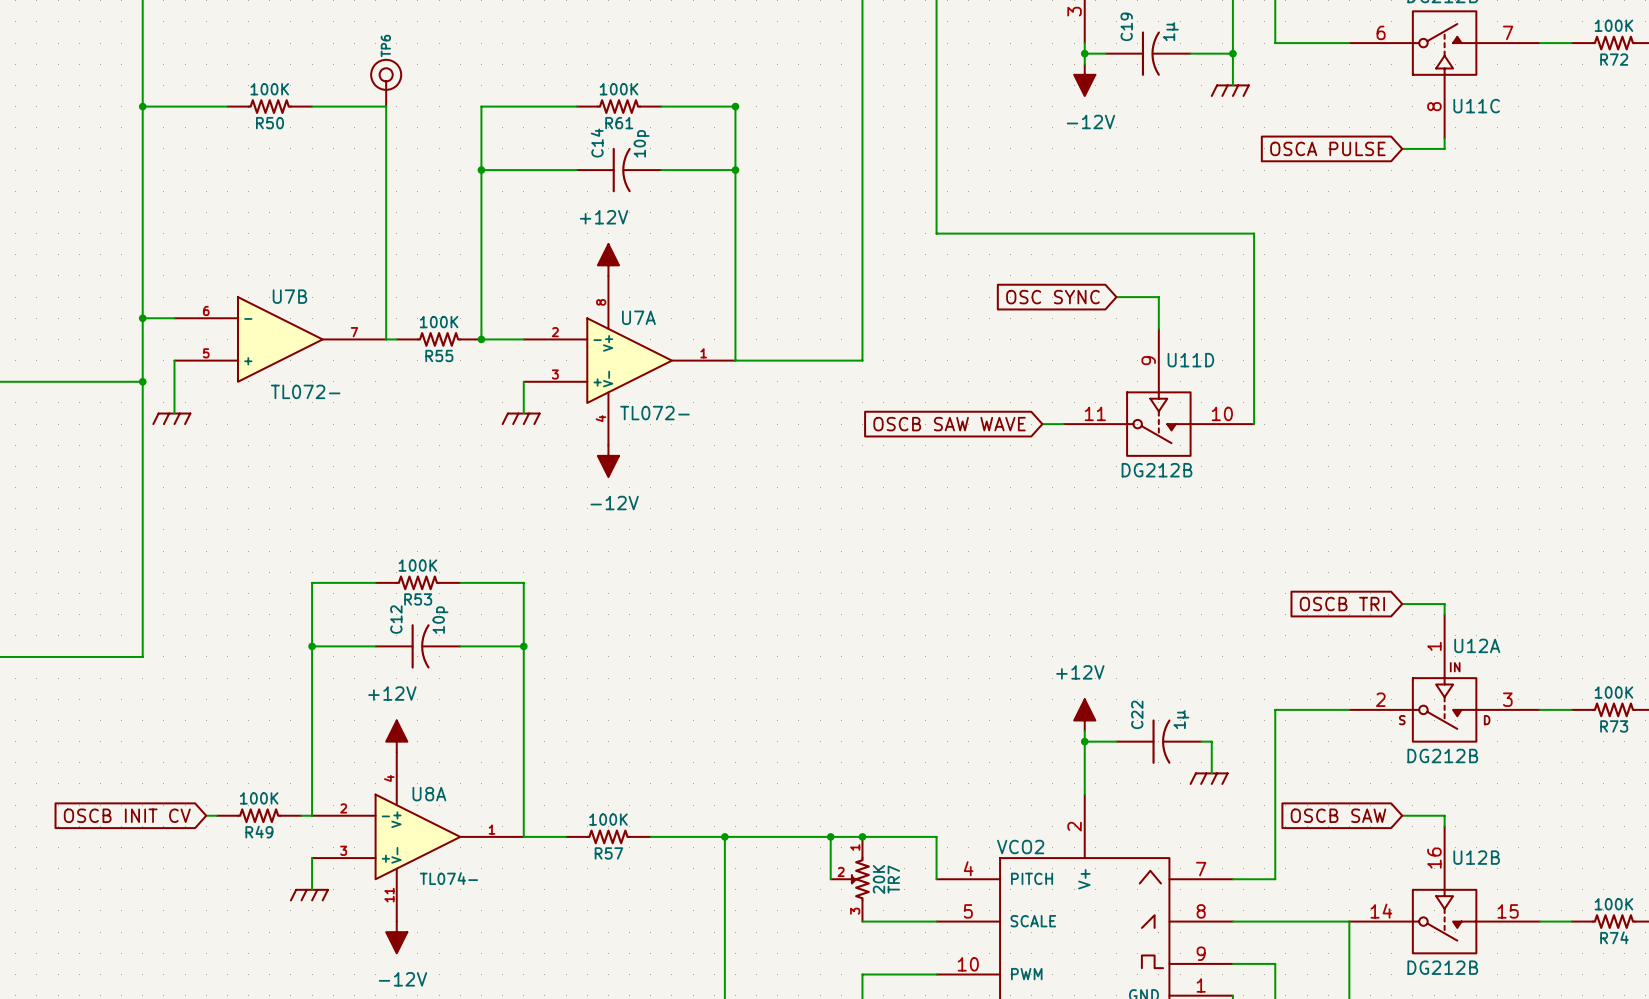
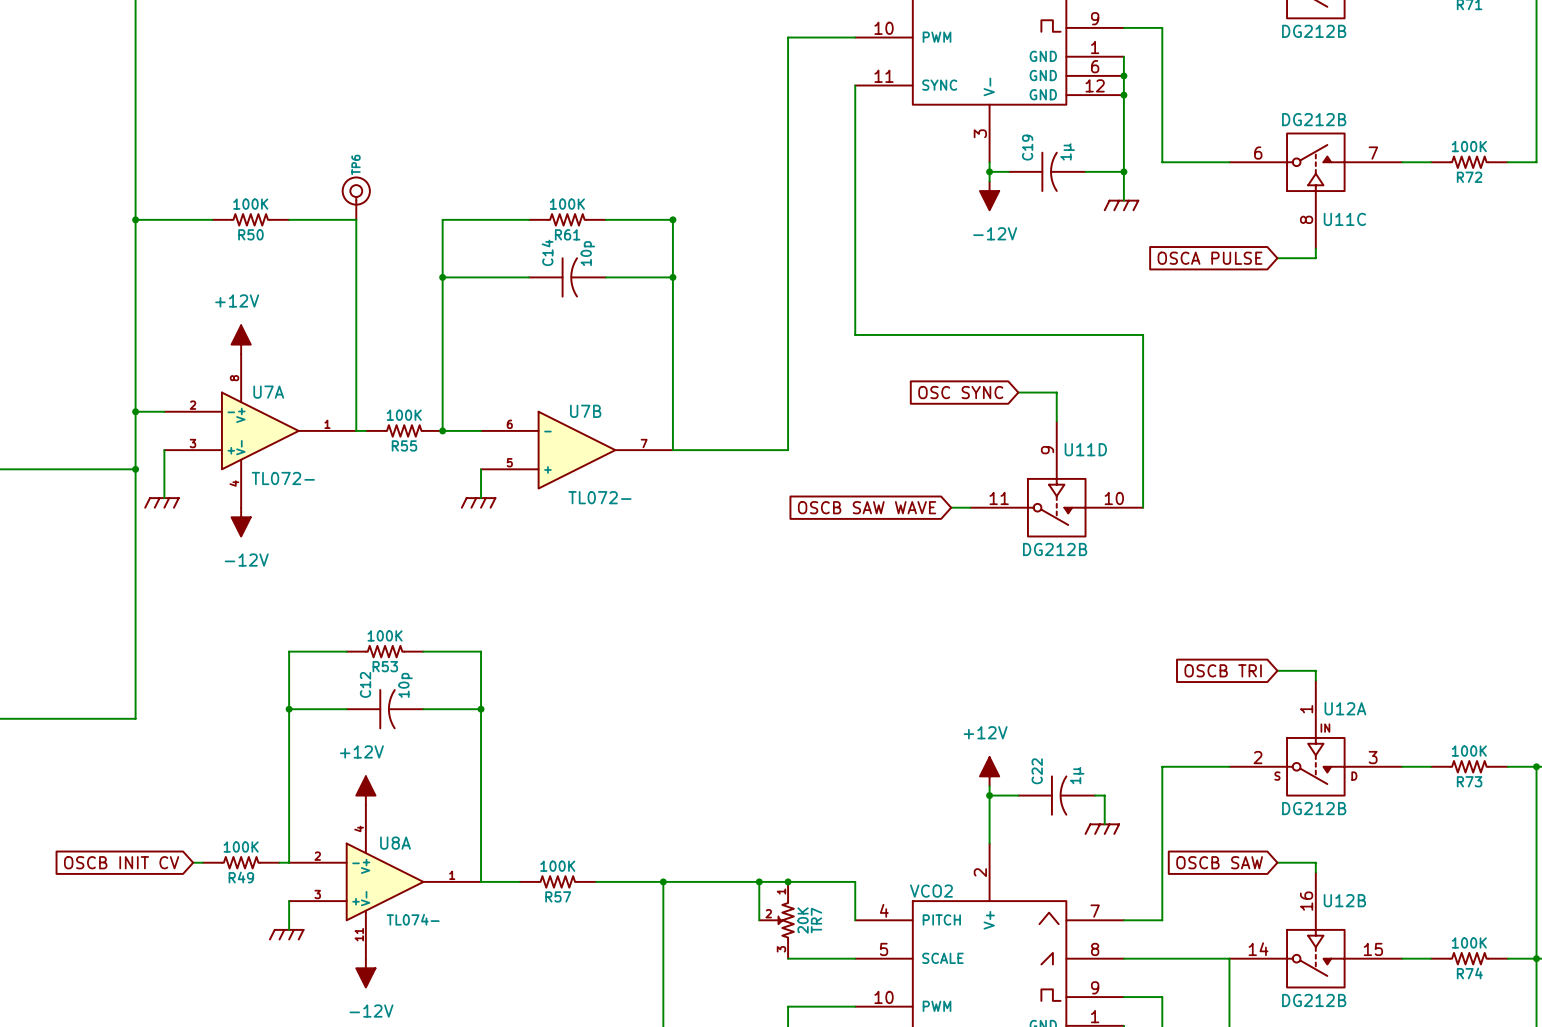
power symbol: none -> +12V (241, 339)
power symbol: +12V (608, 260) -> none
U7B position: (280, 339) -> (576, 450)
U7A position: (629, 360) -> (260, 430)
power symbol: none -> -12V (241, 522)
power symbol: -12V (608, 461) -> none

